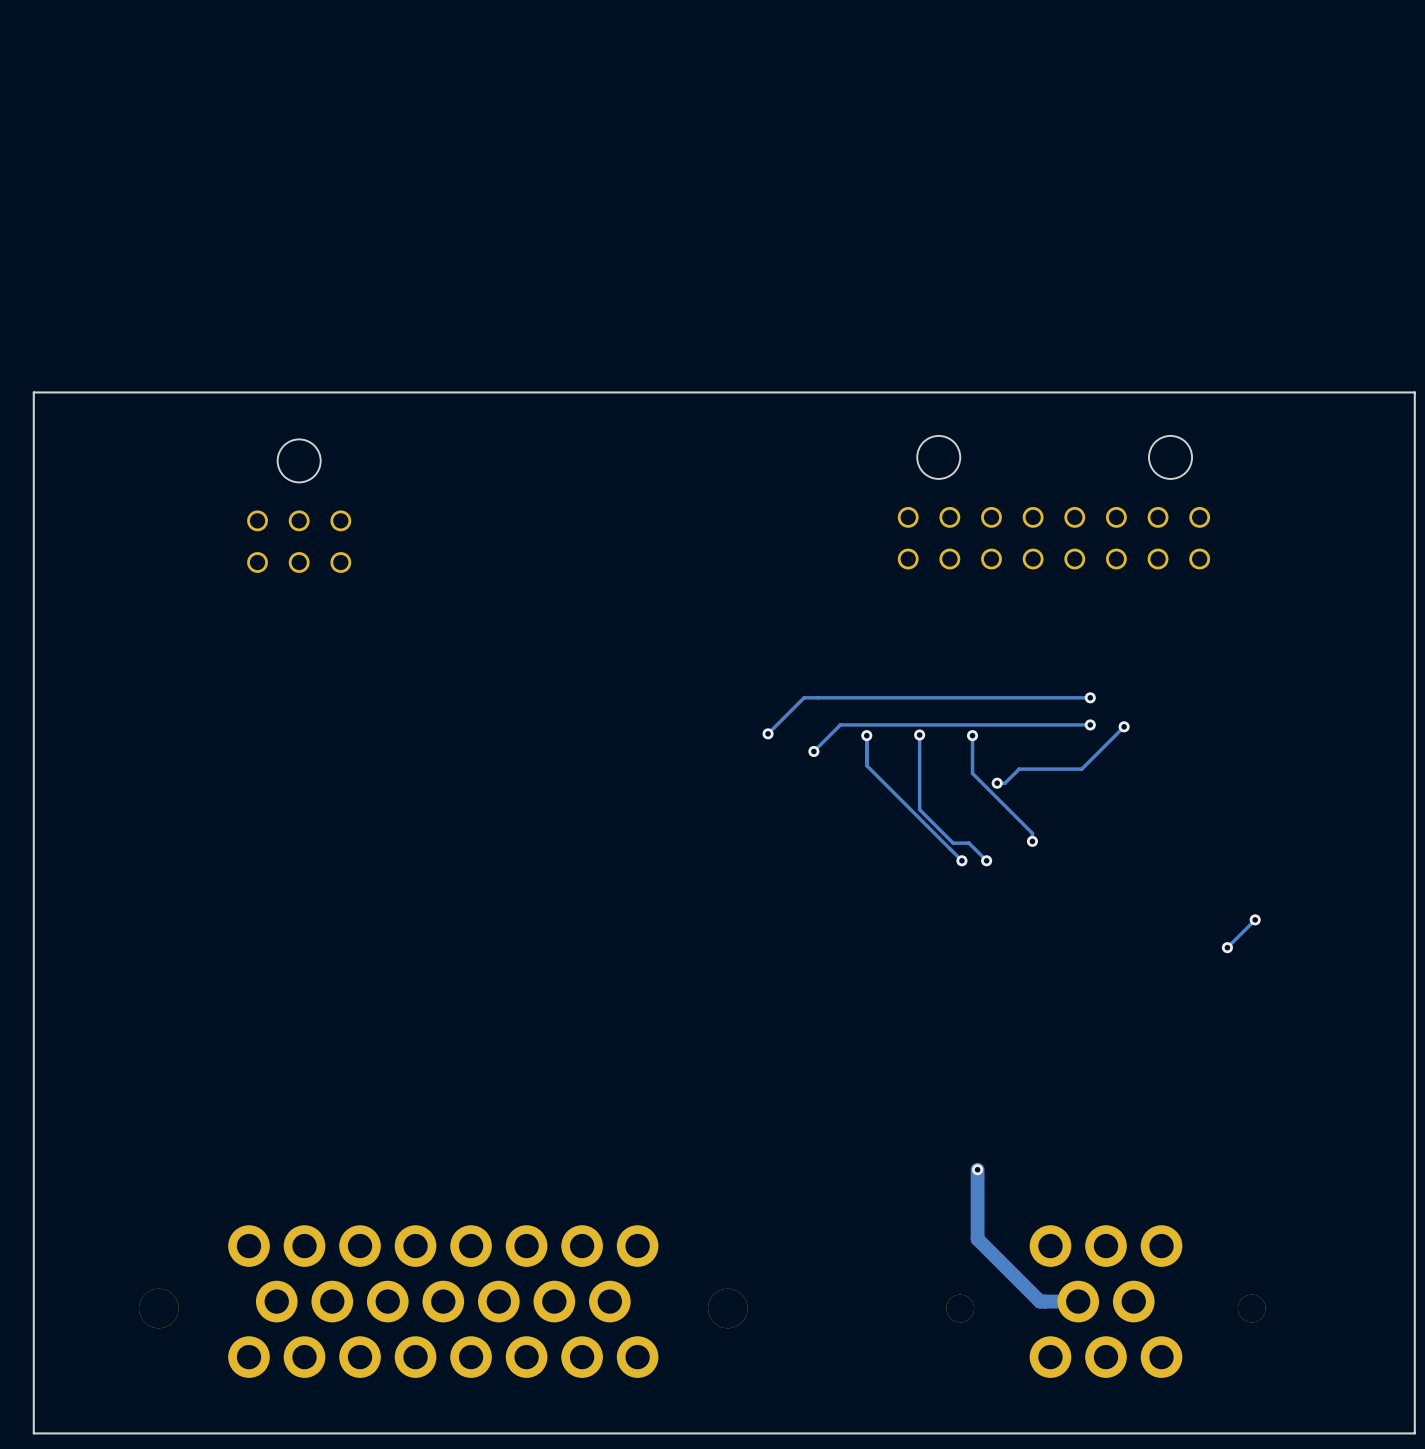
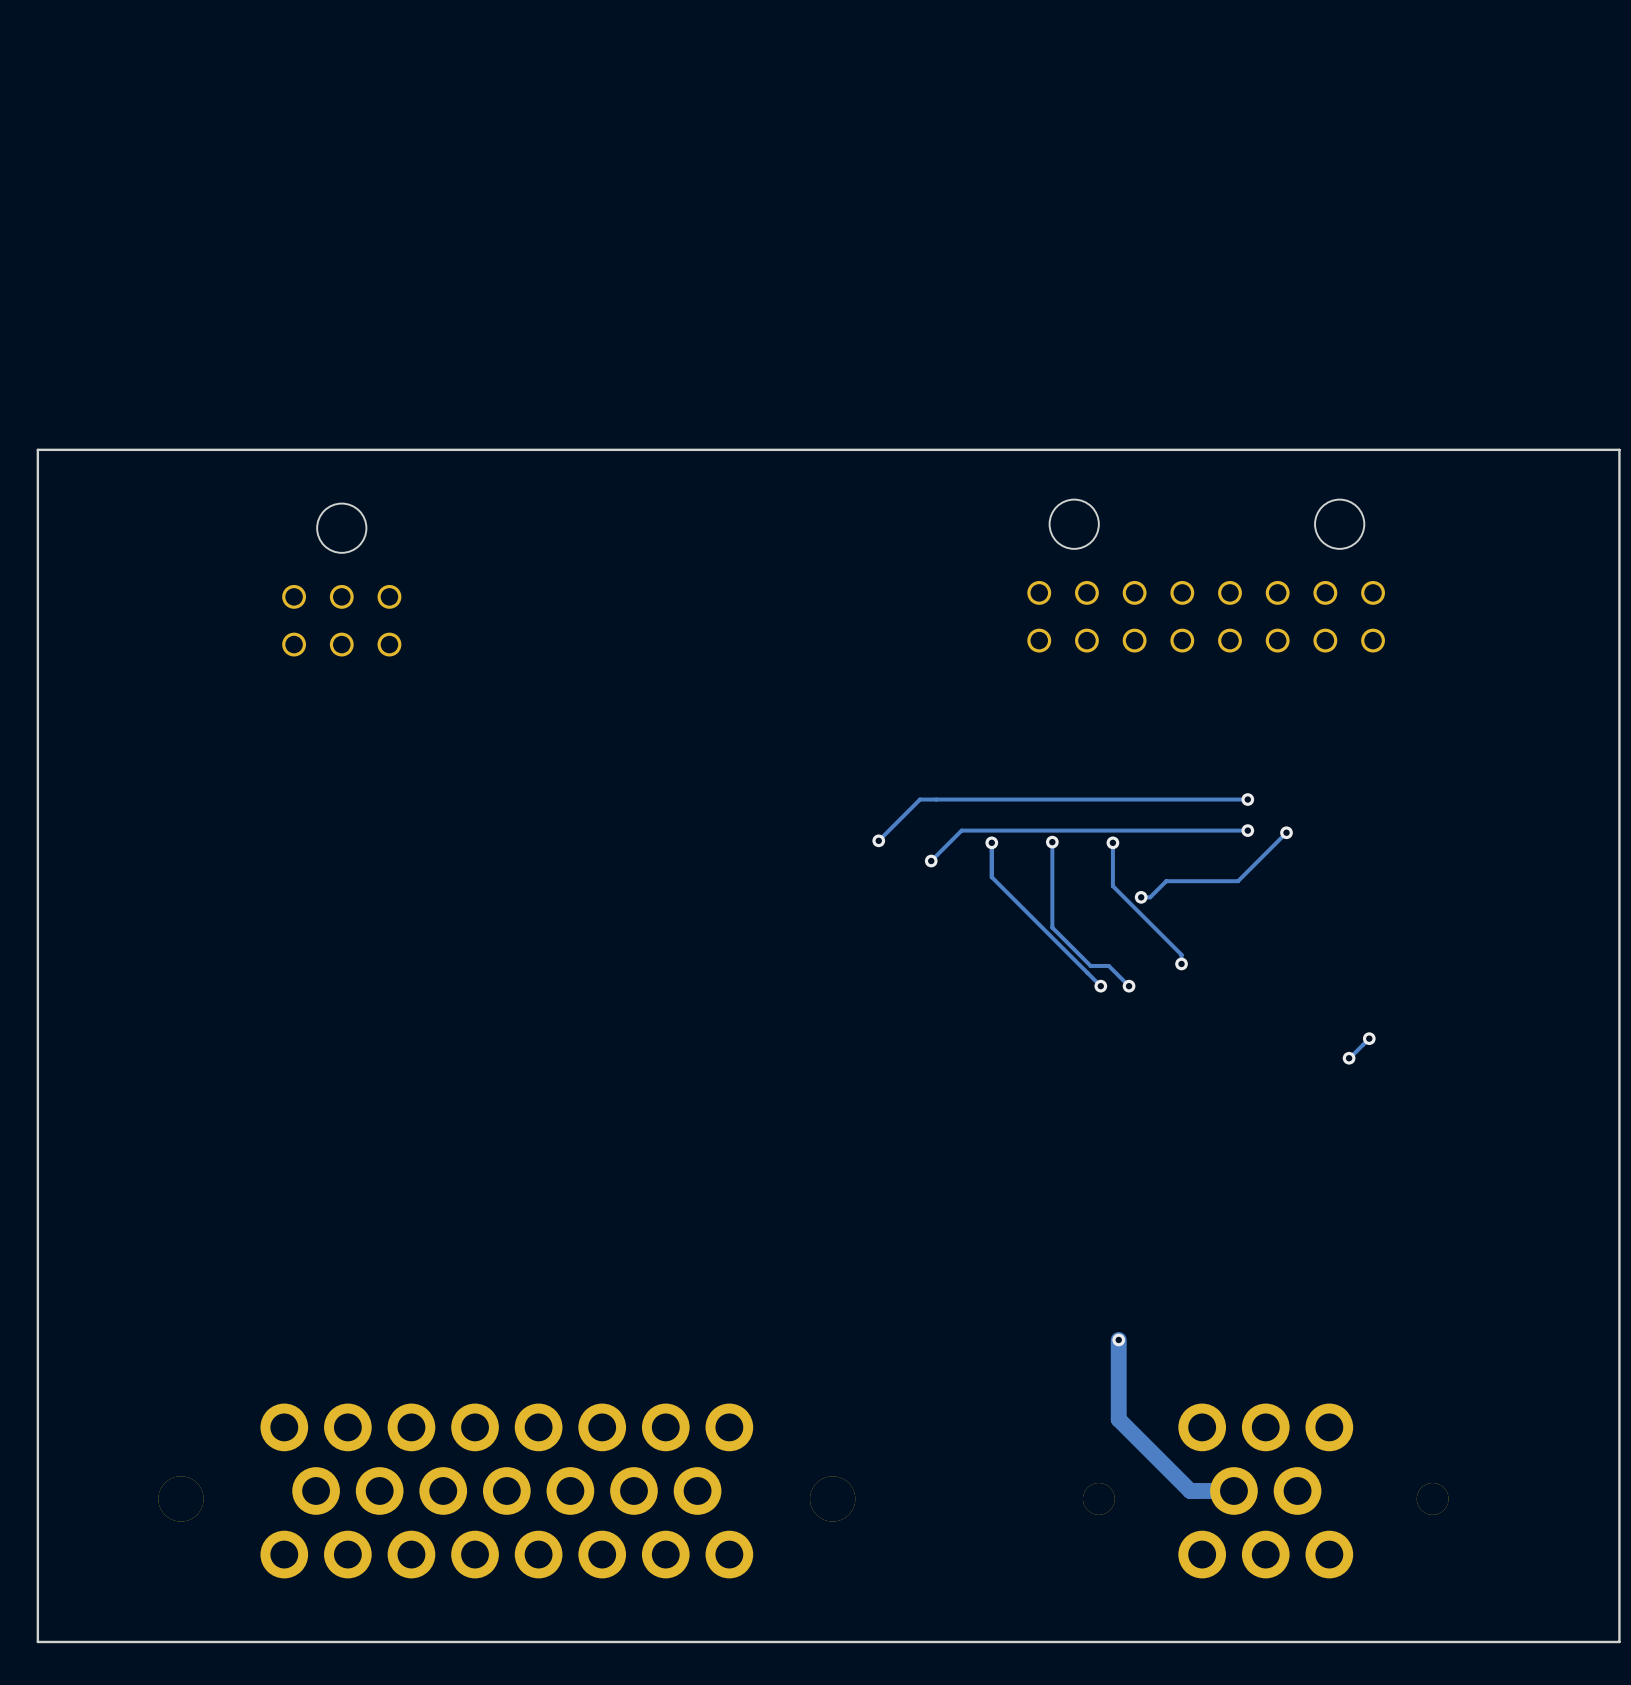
track: none -> (1369, 1038) (1349, 1058)
via: none -> (1369, 1038)
track: (1255, 919) (1227, 947) -> none
via: (1255, 919) -> none
via: none -> (1349, 1058)
via: (1227, 947) -> none

